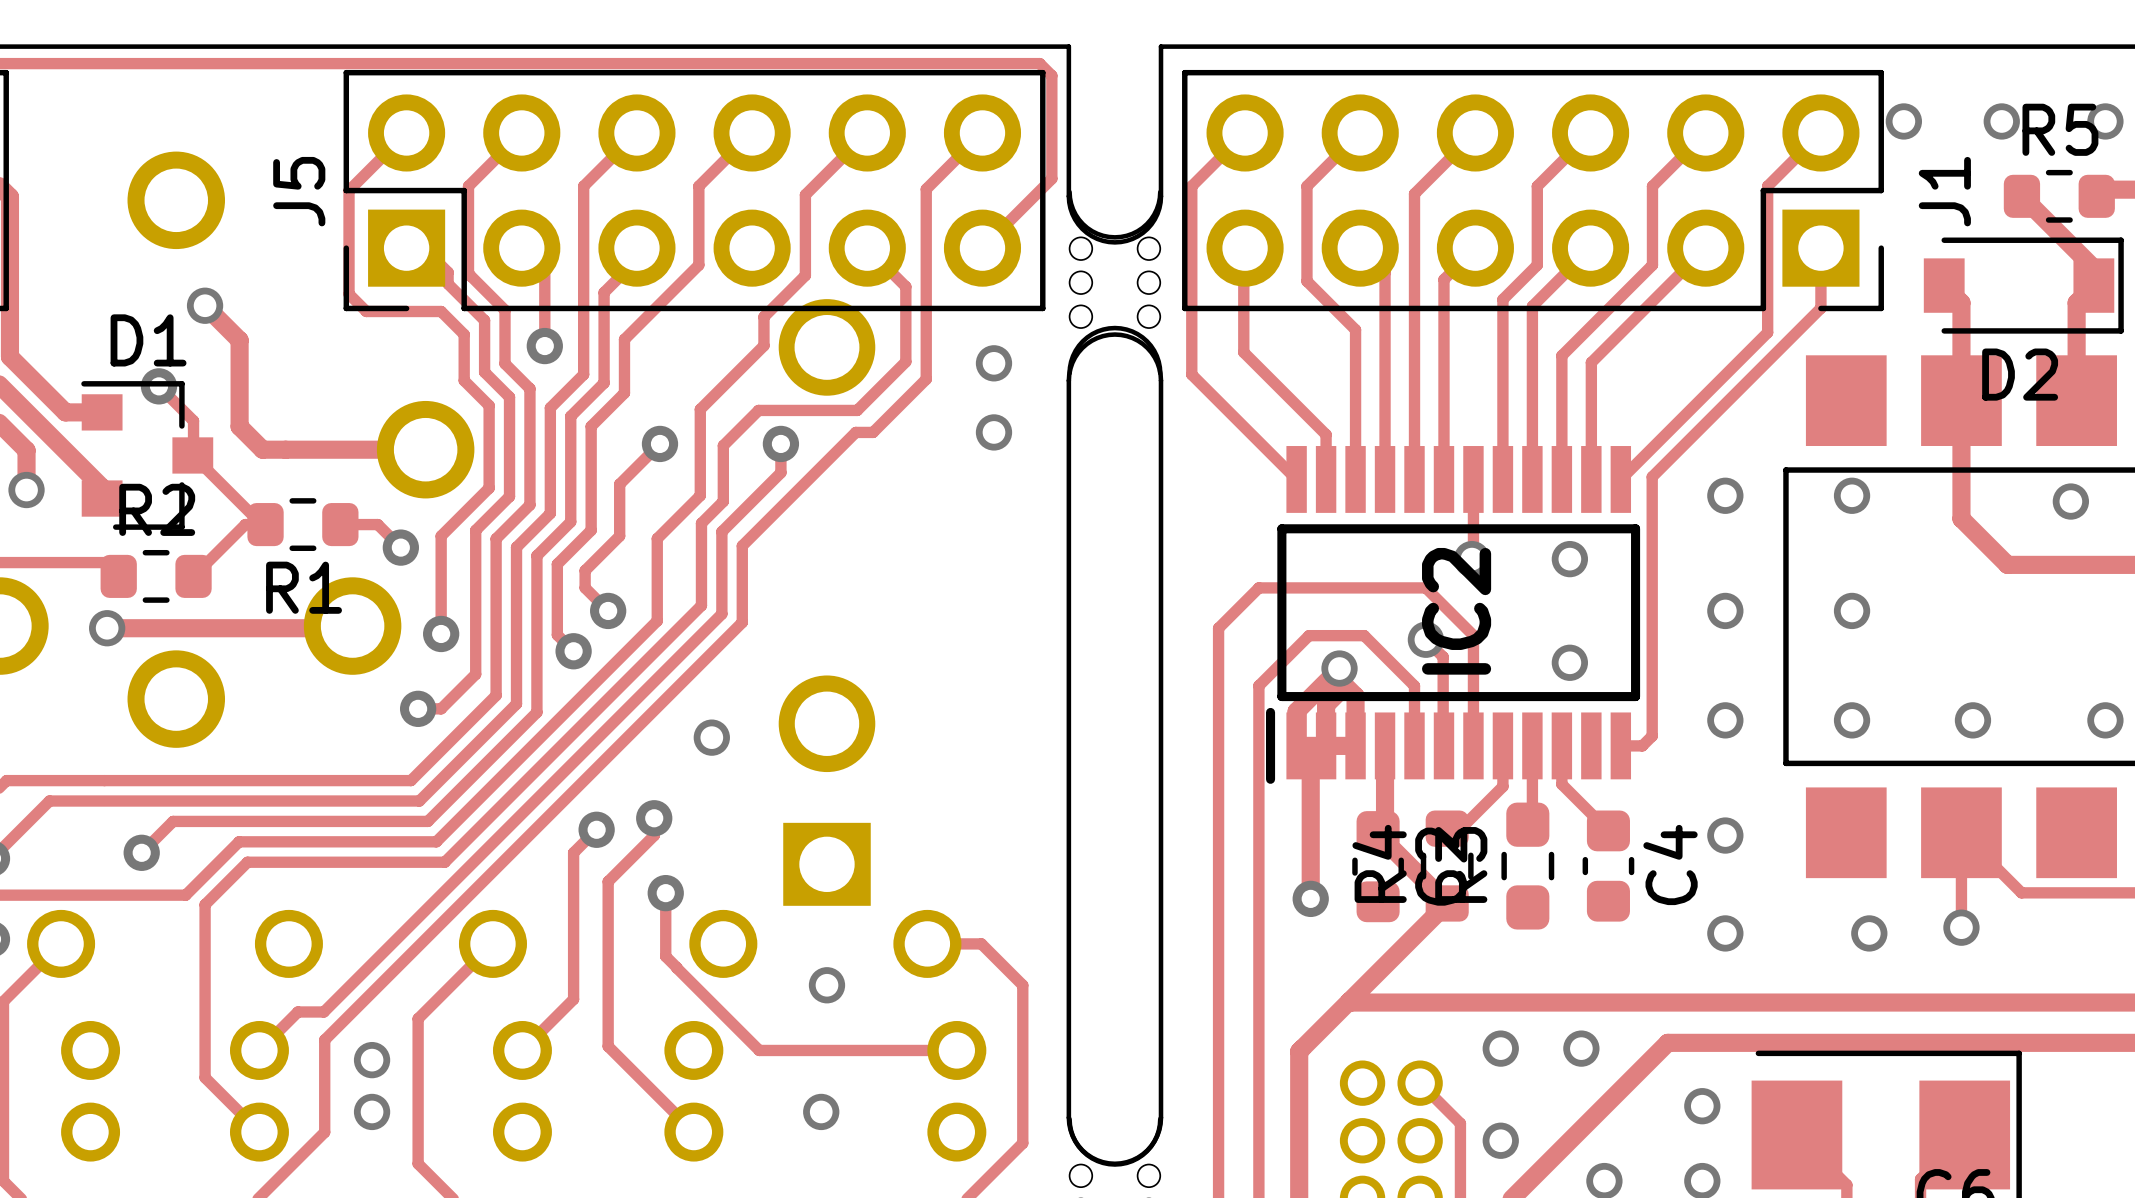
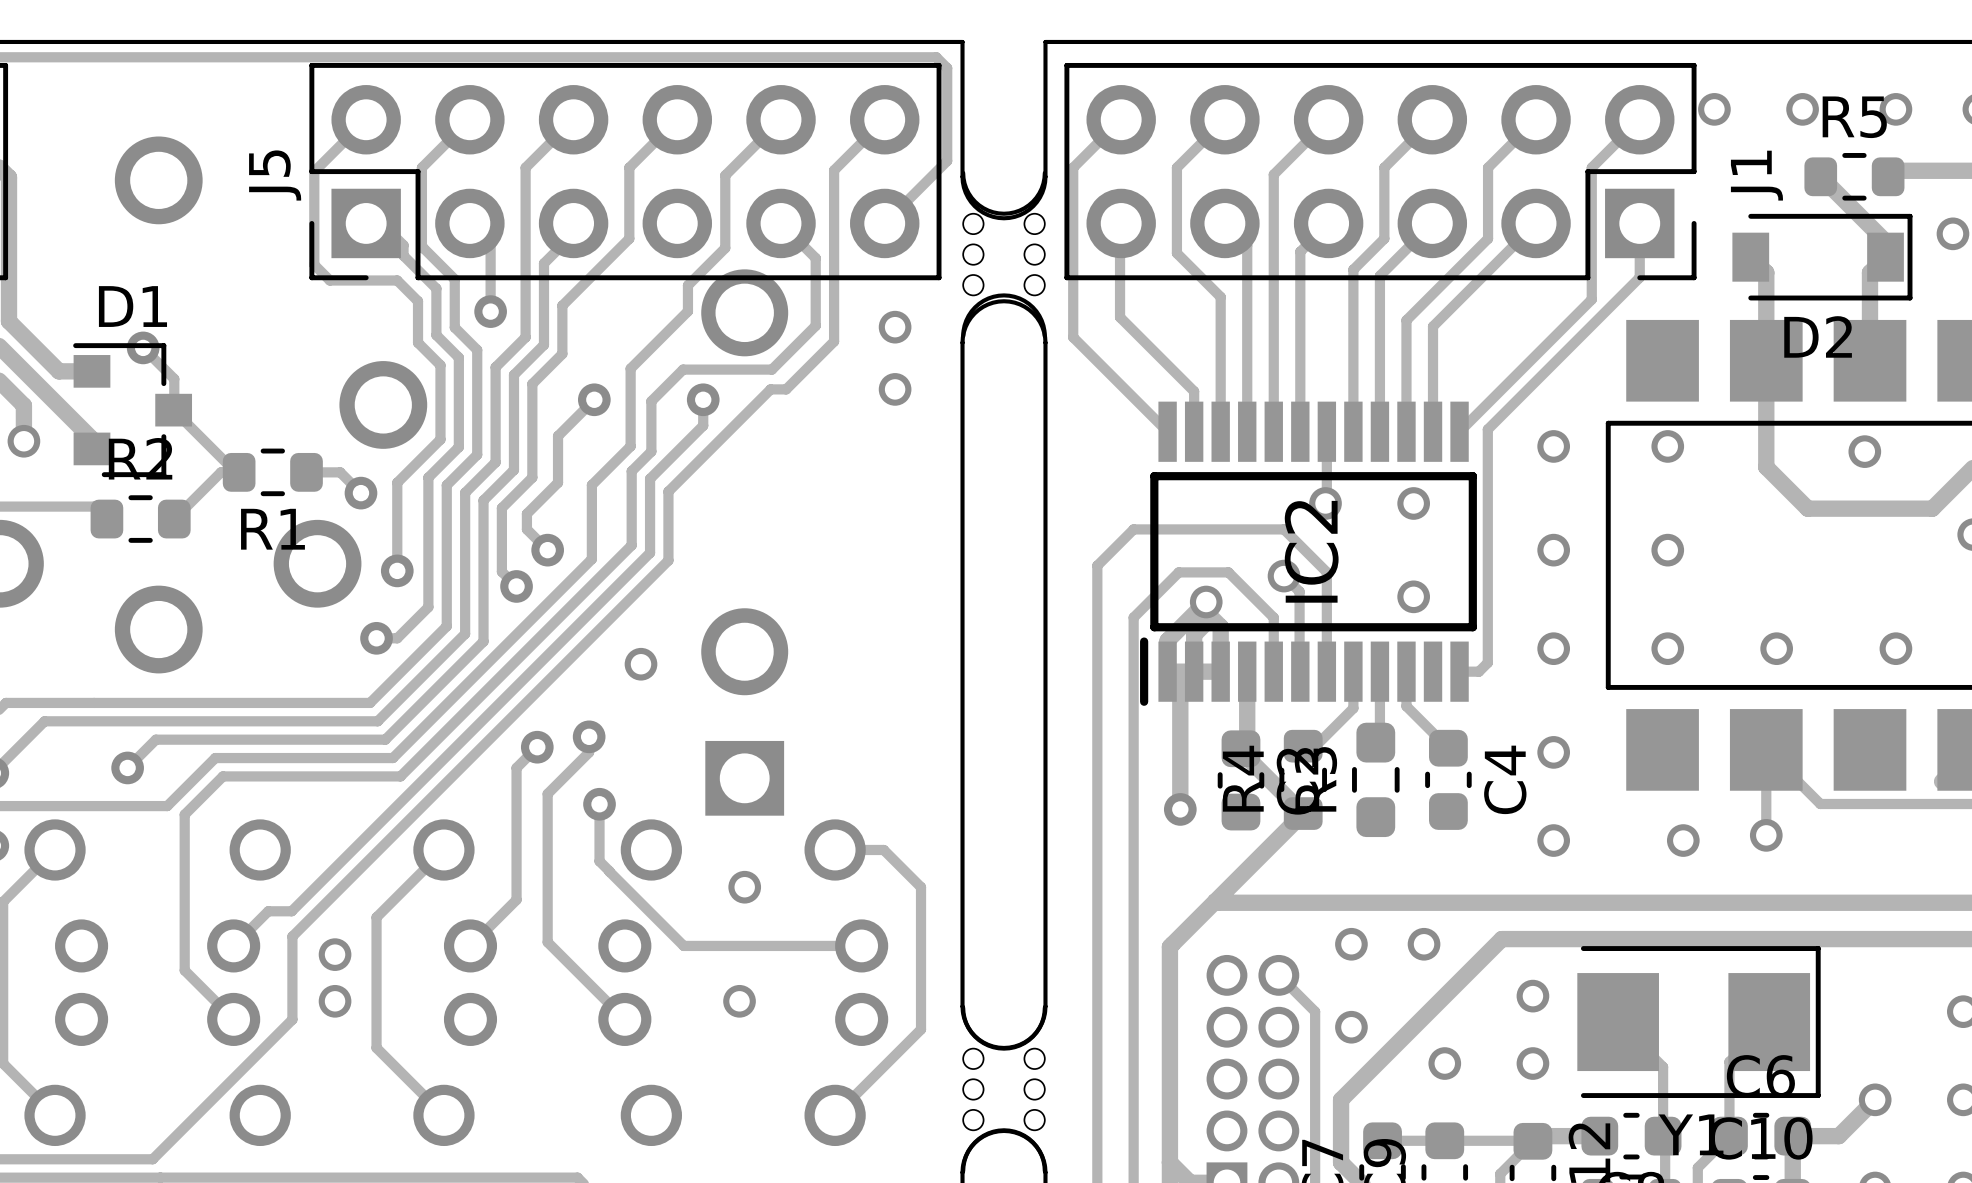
track: (205, 305) (239, 340) (239, 426) (262, 449) (425, 449) -> none
via: (205, 305) -> none
track: (107, 628) (350, 628) -> none
via: (107, 628) -> none

